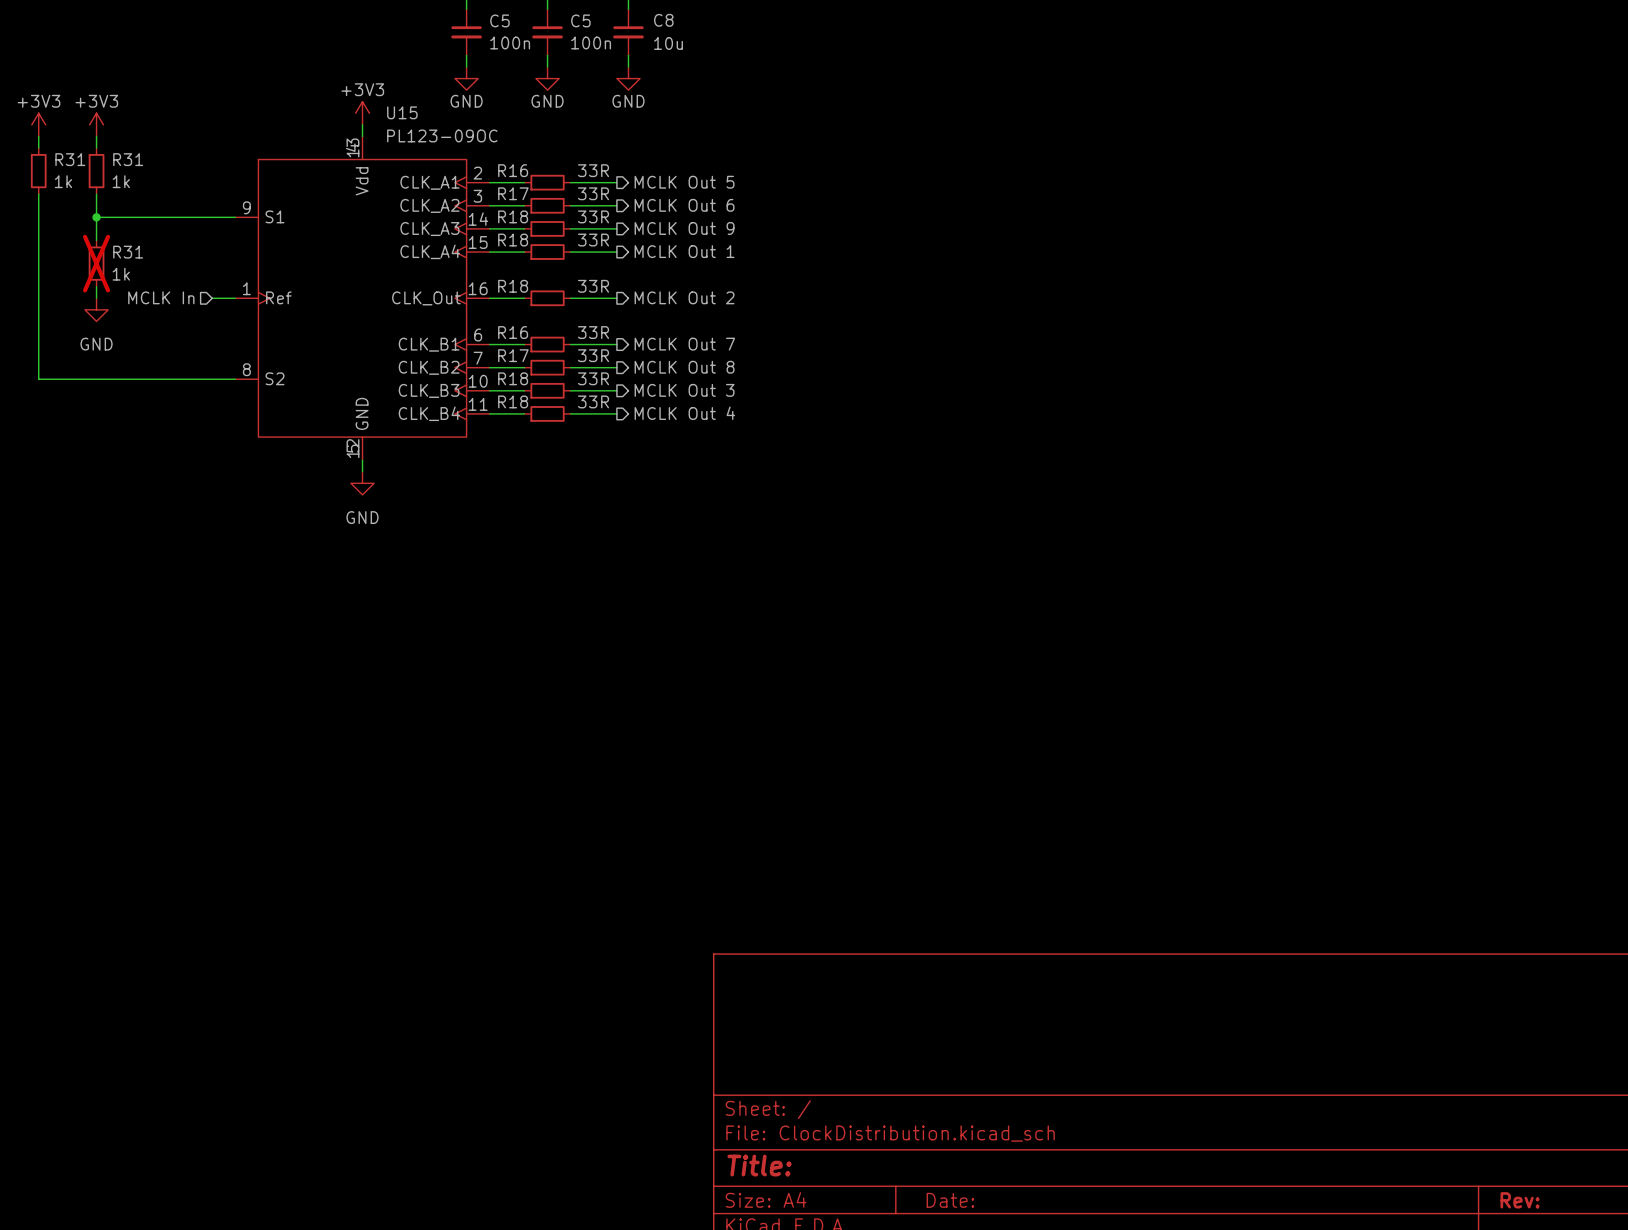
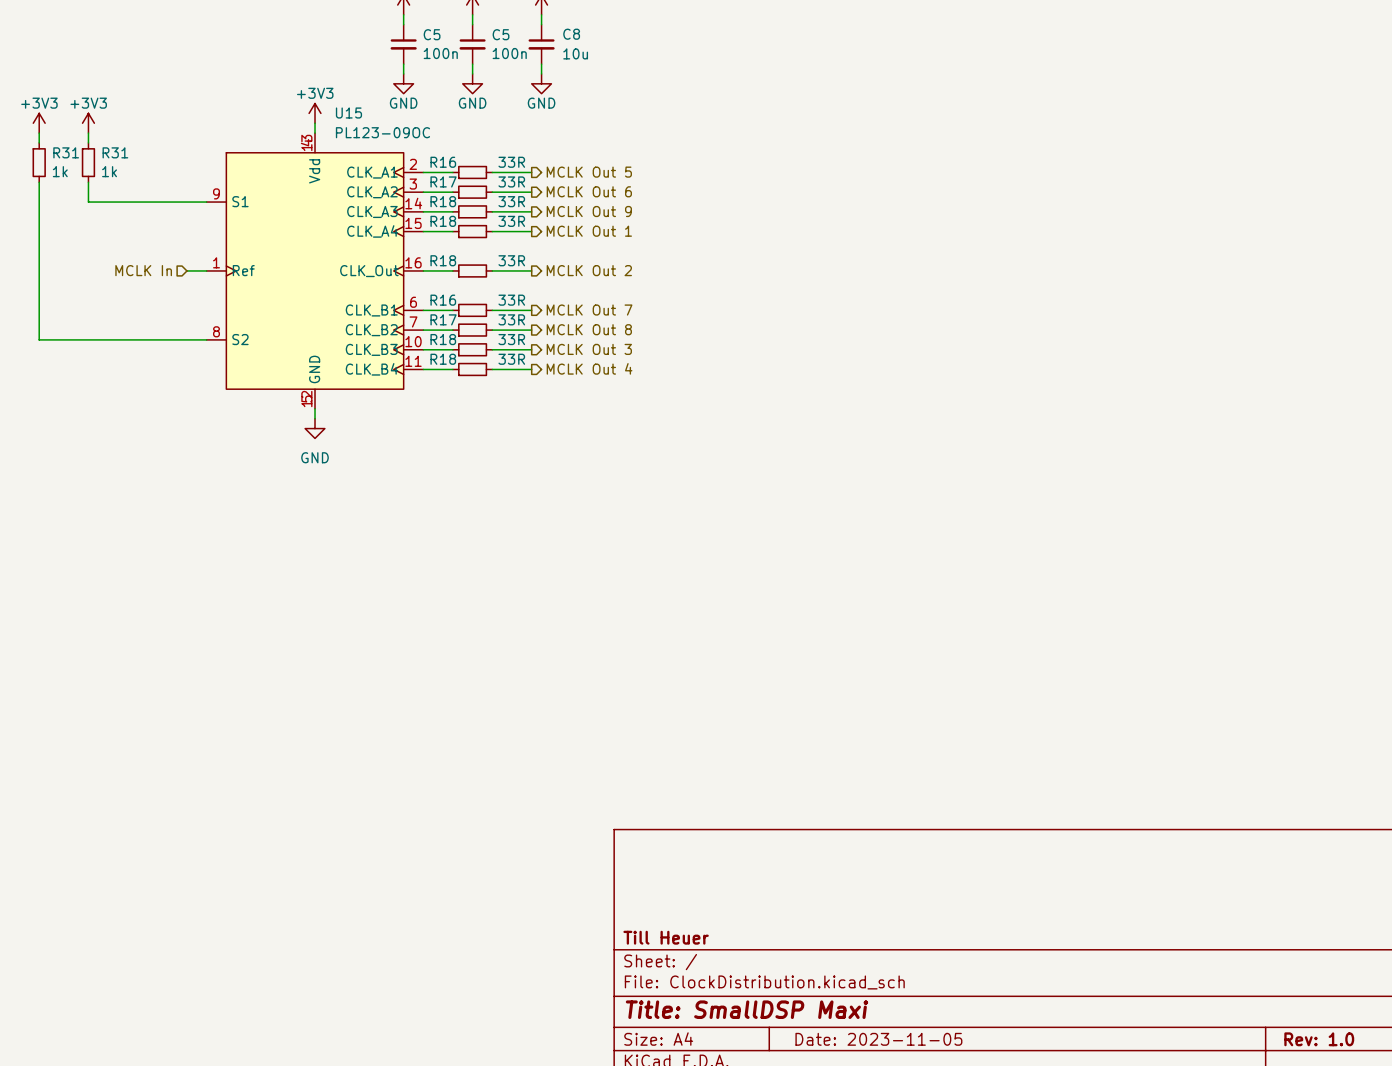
wire: (96, 217) (96, 240) -> none
junction: (96, 217) -> none
R31: 1k (96, 263) -> none
wire: (96, 286) (96, 298) -> none
power symbol: GND (96, 309) -> none
title block: none -> Till Heuer (666, 937)
title block: Title: (759, 1165) -> Title: SmallDSP Maxi (746, 1009)
title block: Date: (950, 1200) -> Date: 2023-11-05 (878, 1039)
title block: Rev: (1520, 1200) -> Rev: 1.0 (1319, 1039)

